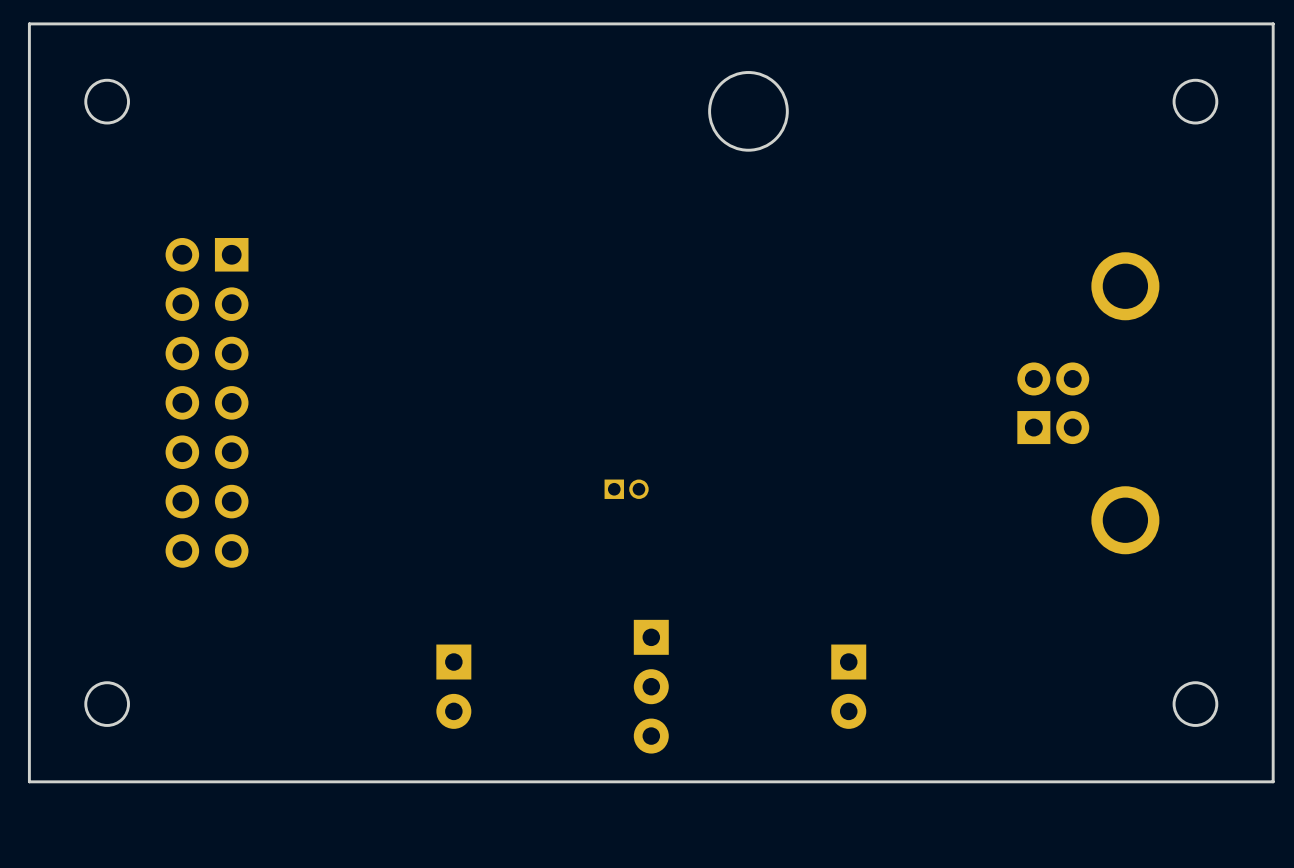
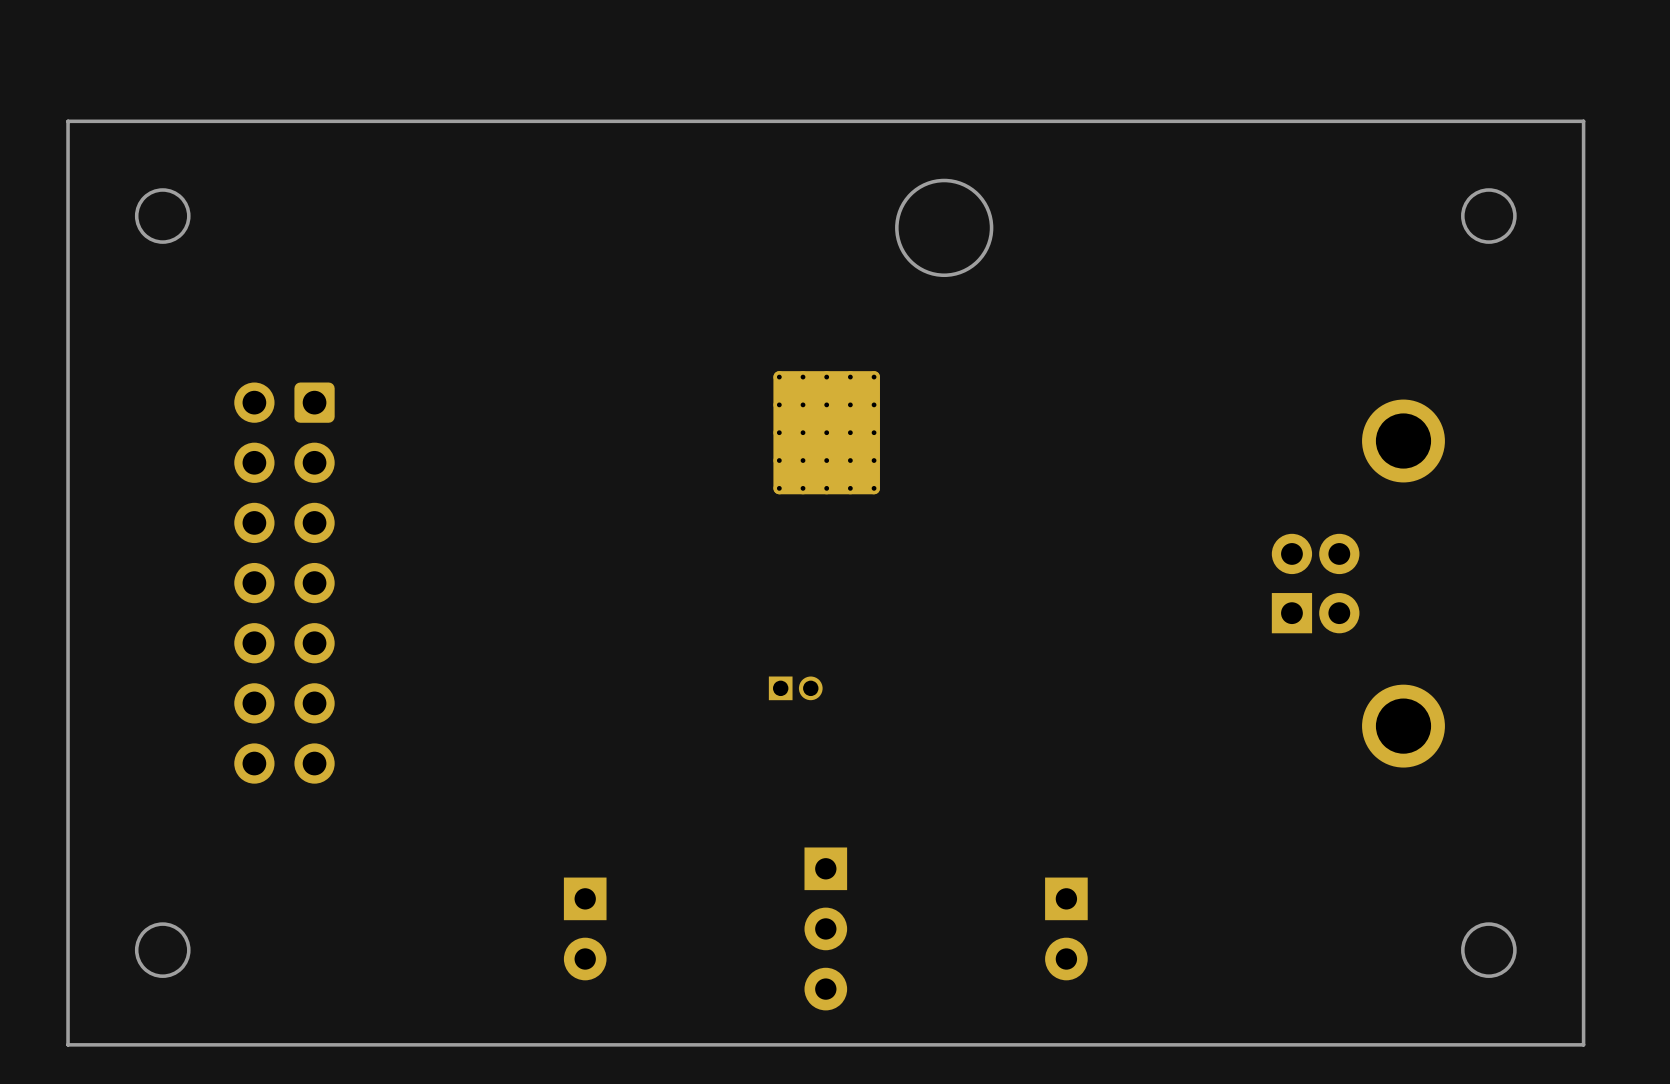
part footprint: [165, 237, 249, 568] -> [234, 382, 335, 784]
part: none -> (826, 432)

